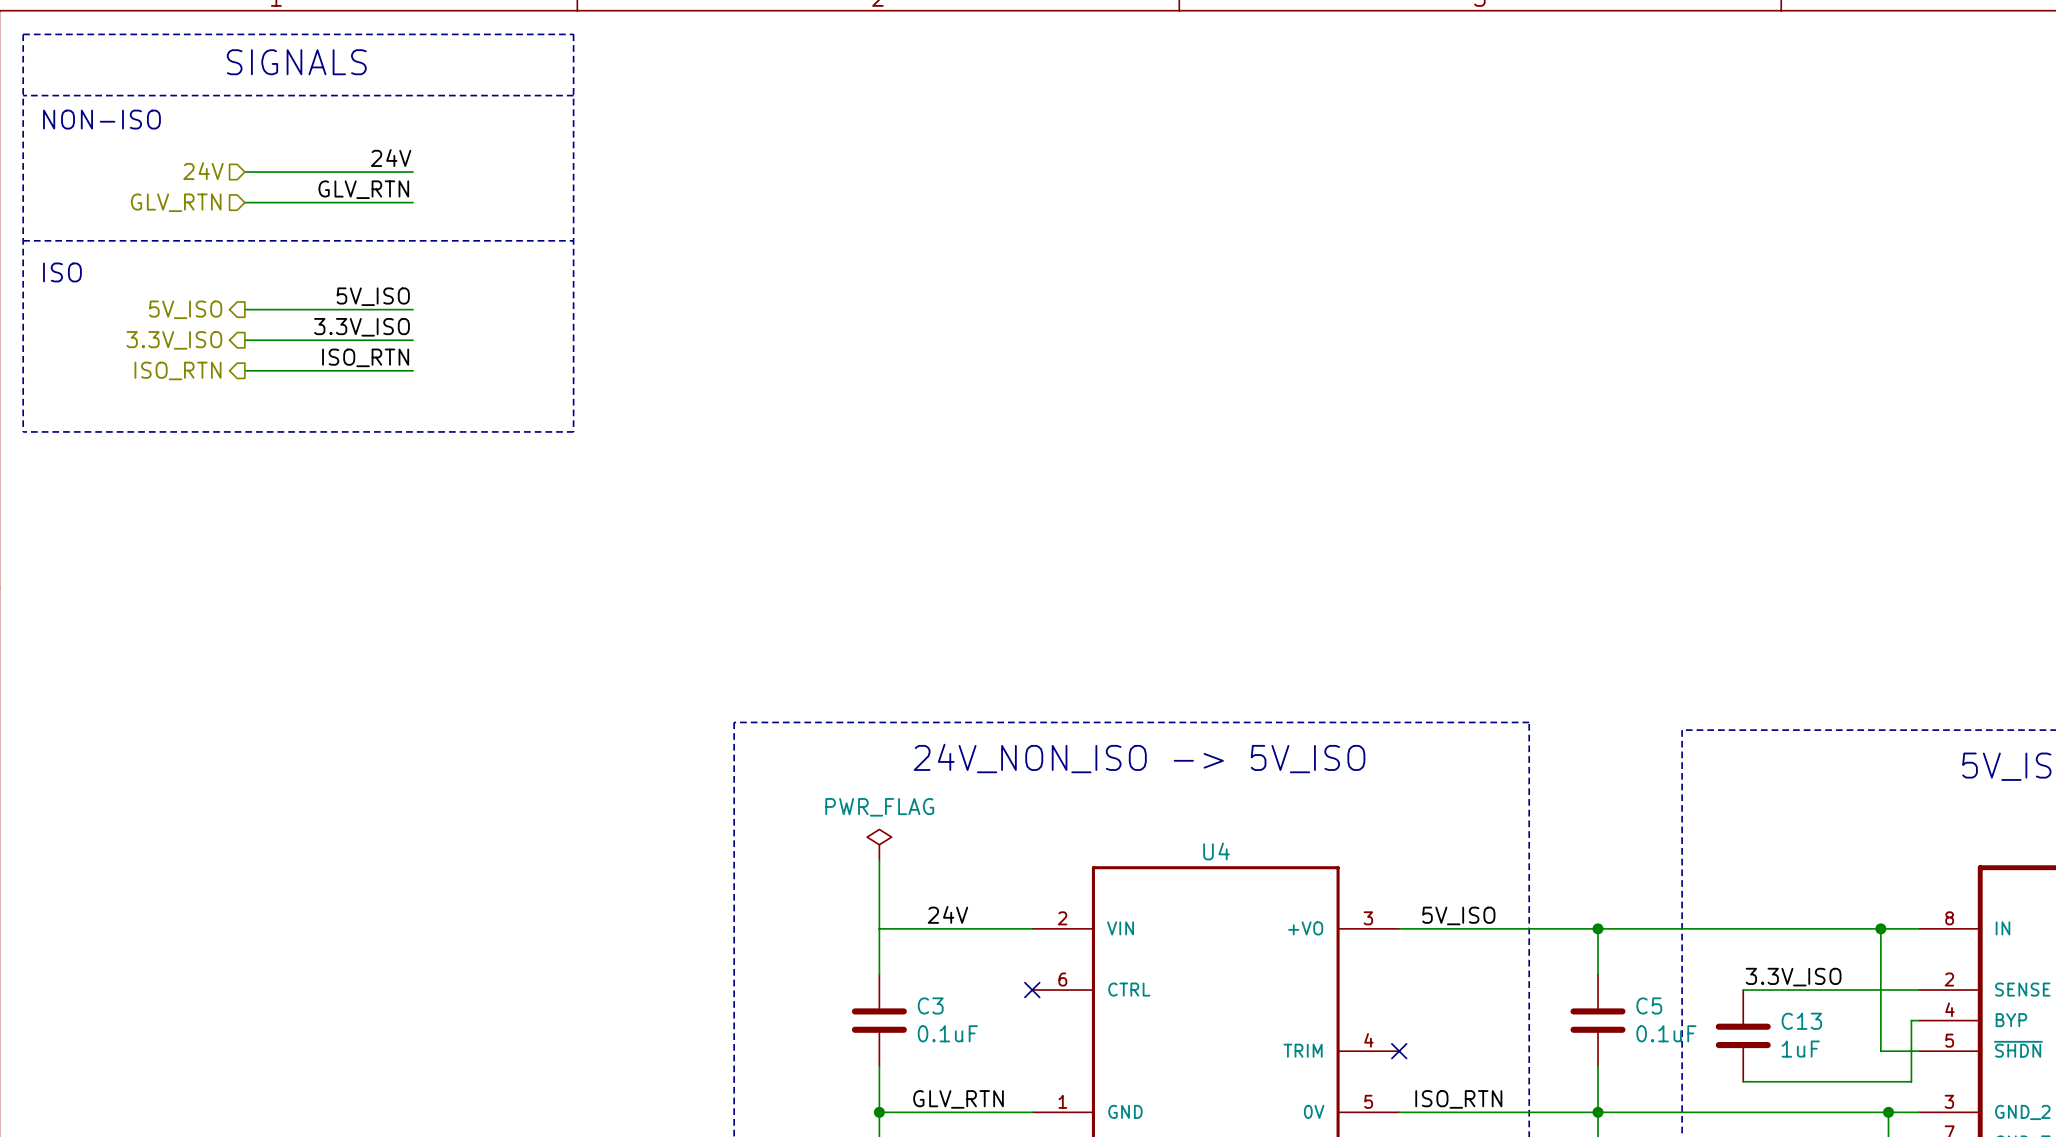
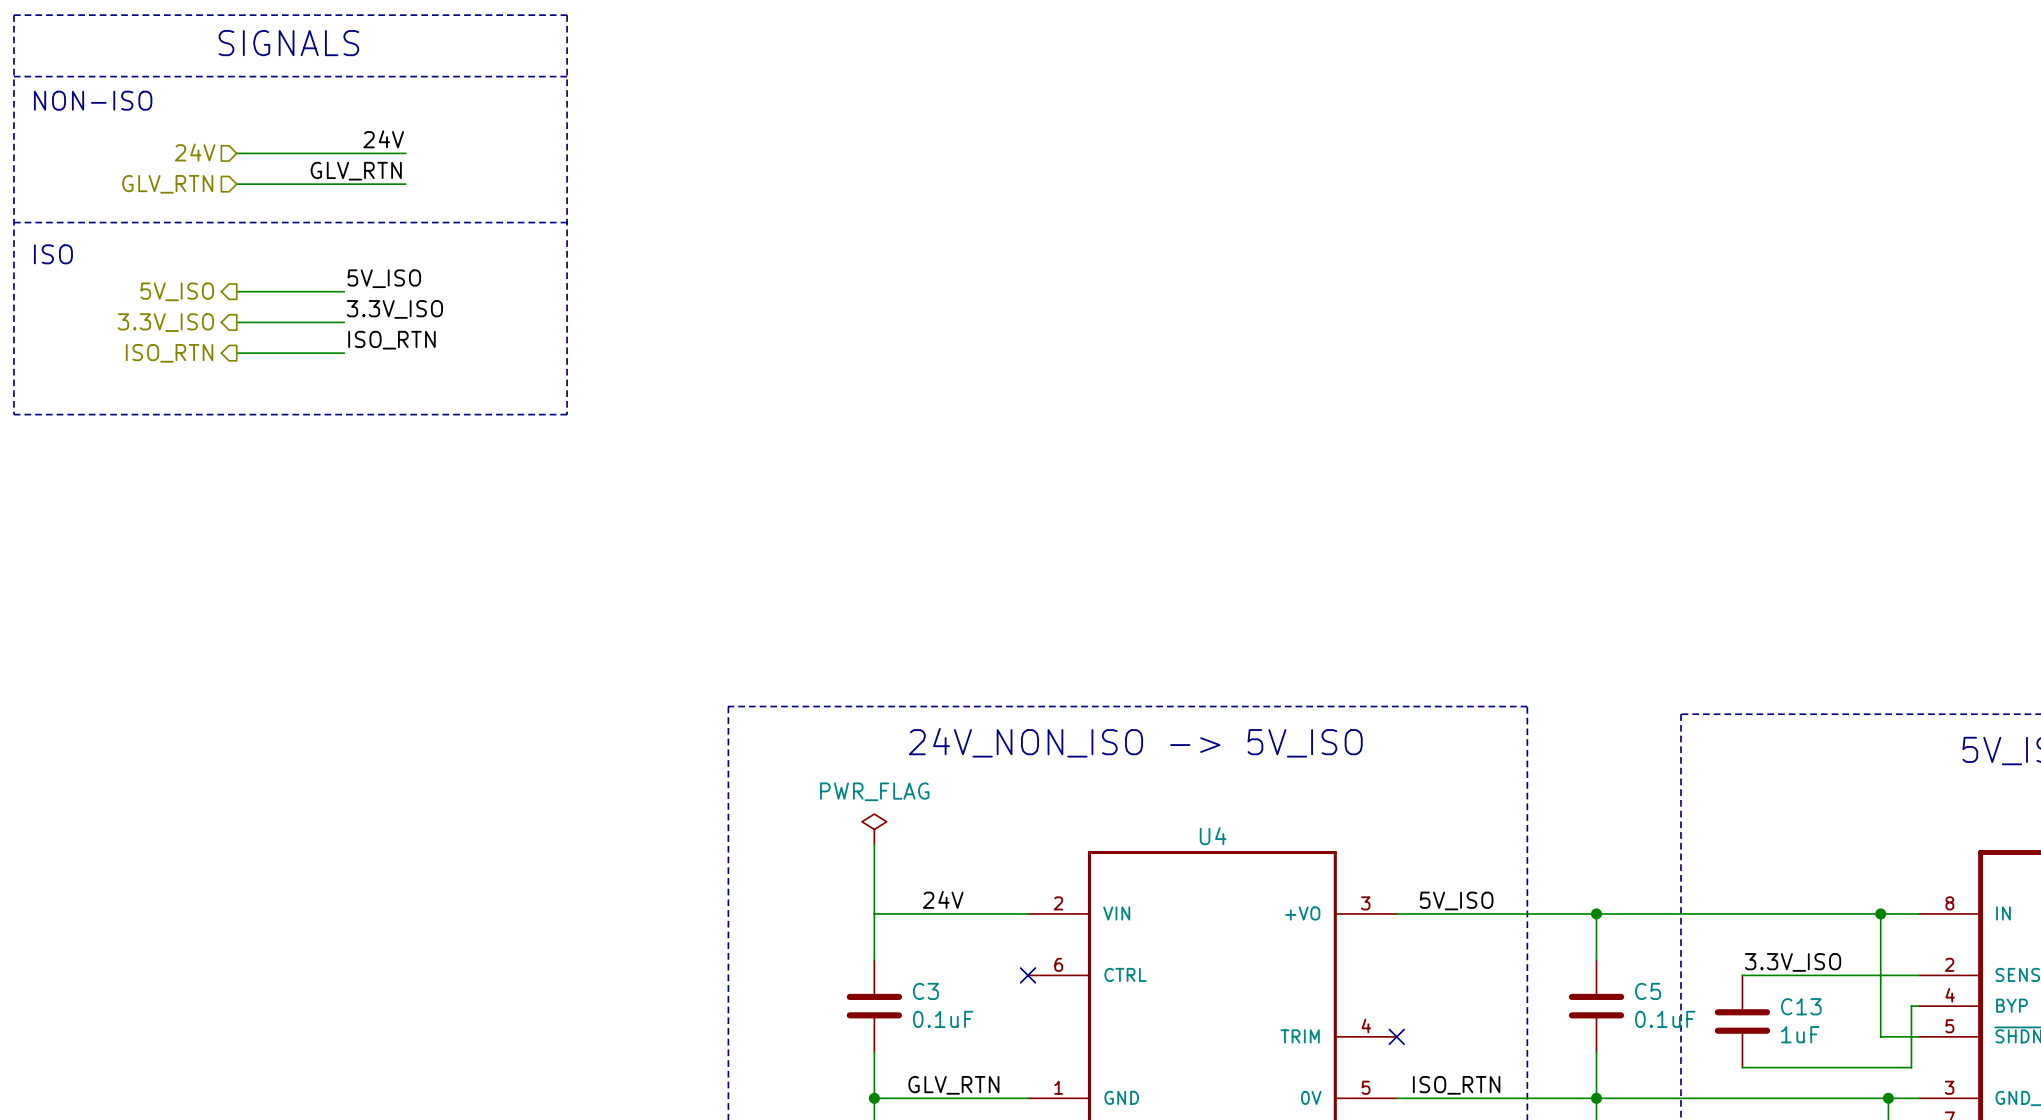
label position: 5V_ISO (373, 296) -> 5V_ISO (384, 278)
wire: (351, 309) (413, 309) -> none
label position: 3.3V_ISO (361, 327) -> 3.3V_ISO (394, 309)
wire: (351, 340) (413, 340) -> none
label position: ISO_RTN (365, 357) -> ISO_RTN (391, 340)
wire: (351, 370) (413, 370) -> none

